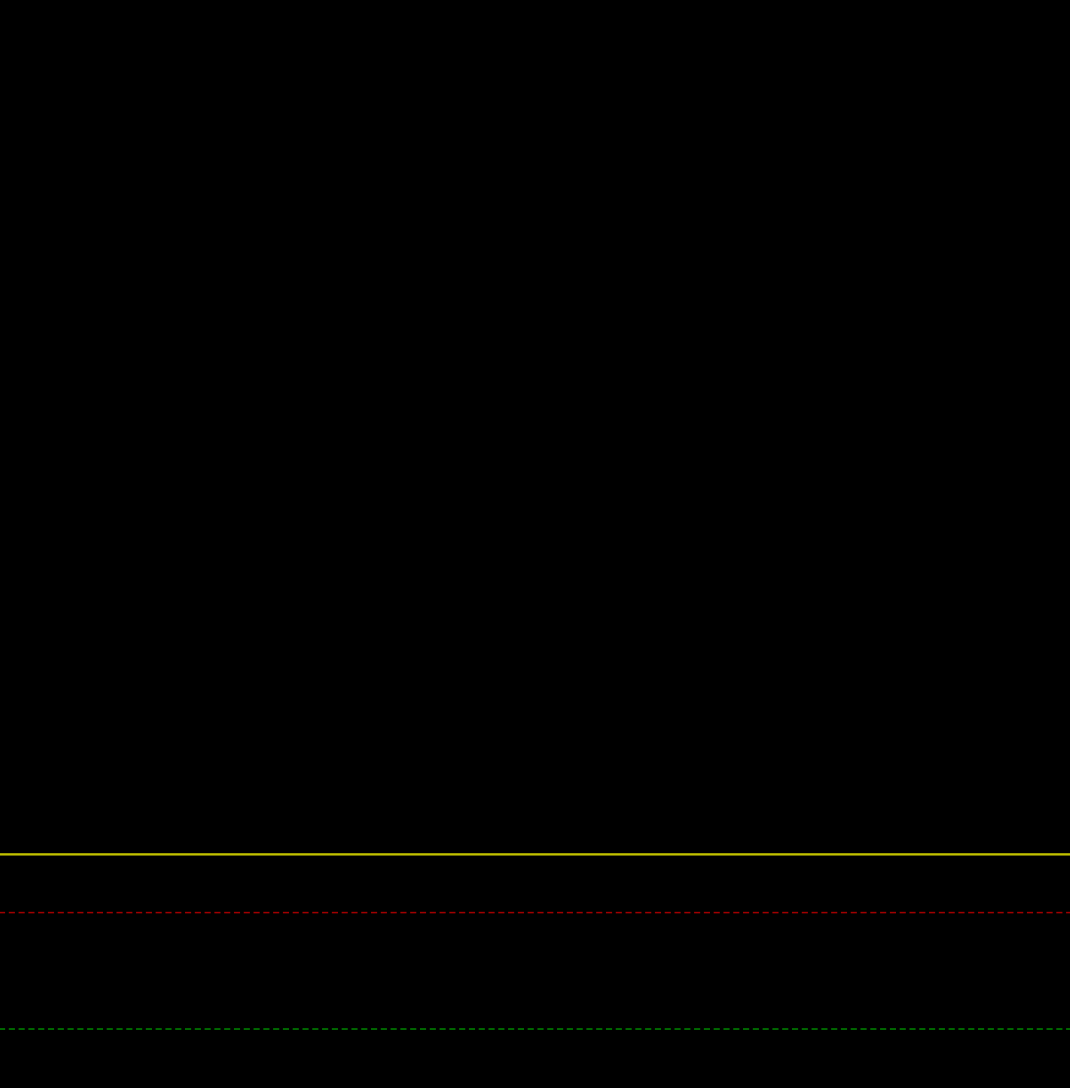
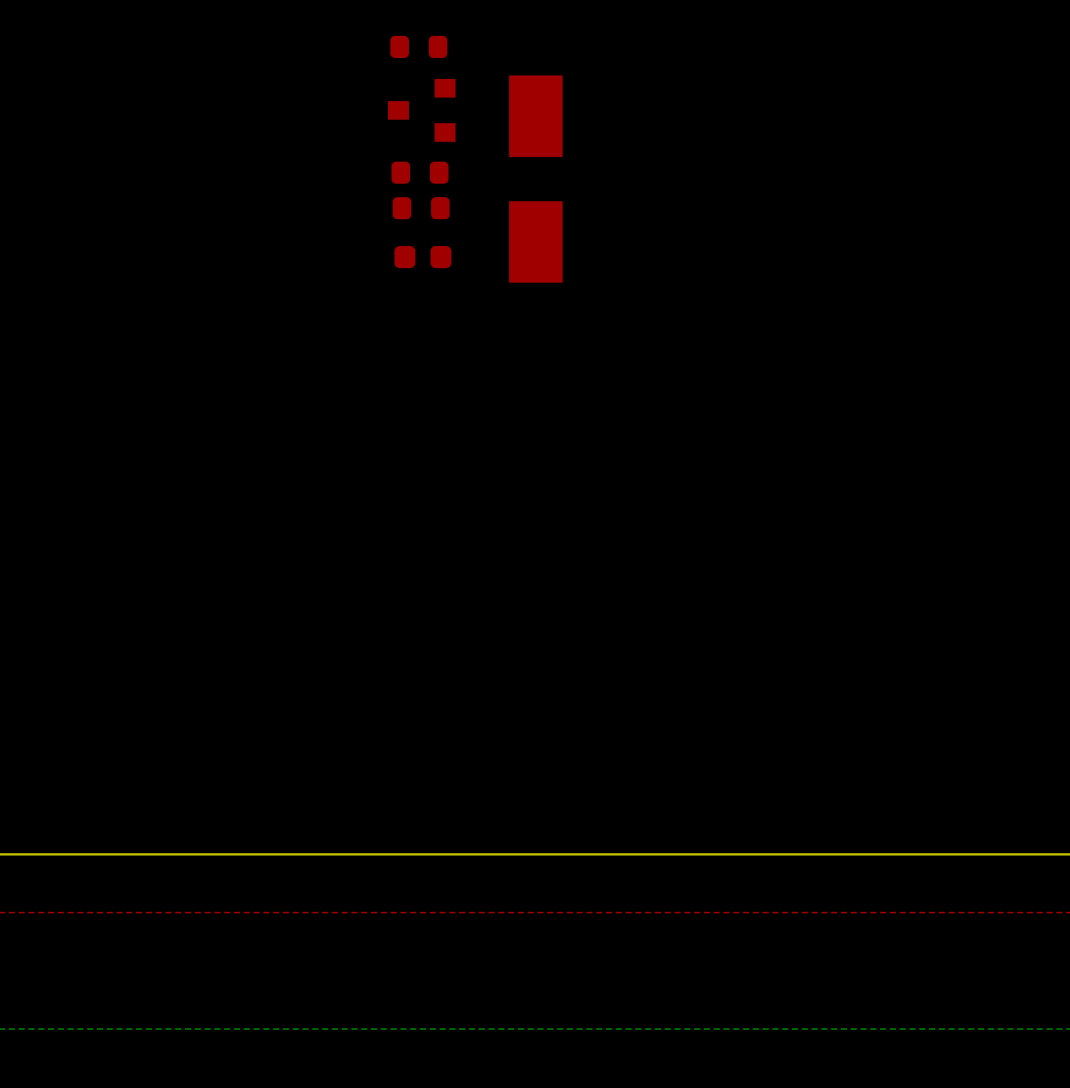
part: none -> (418, 46)
part: none -> (421, 110)
part: none -> (420, 172)
part: none -> (535, 179)
part: none -> (421, 208)
part: none -> (422, 257)

